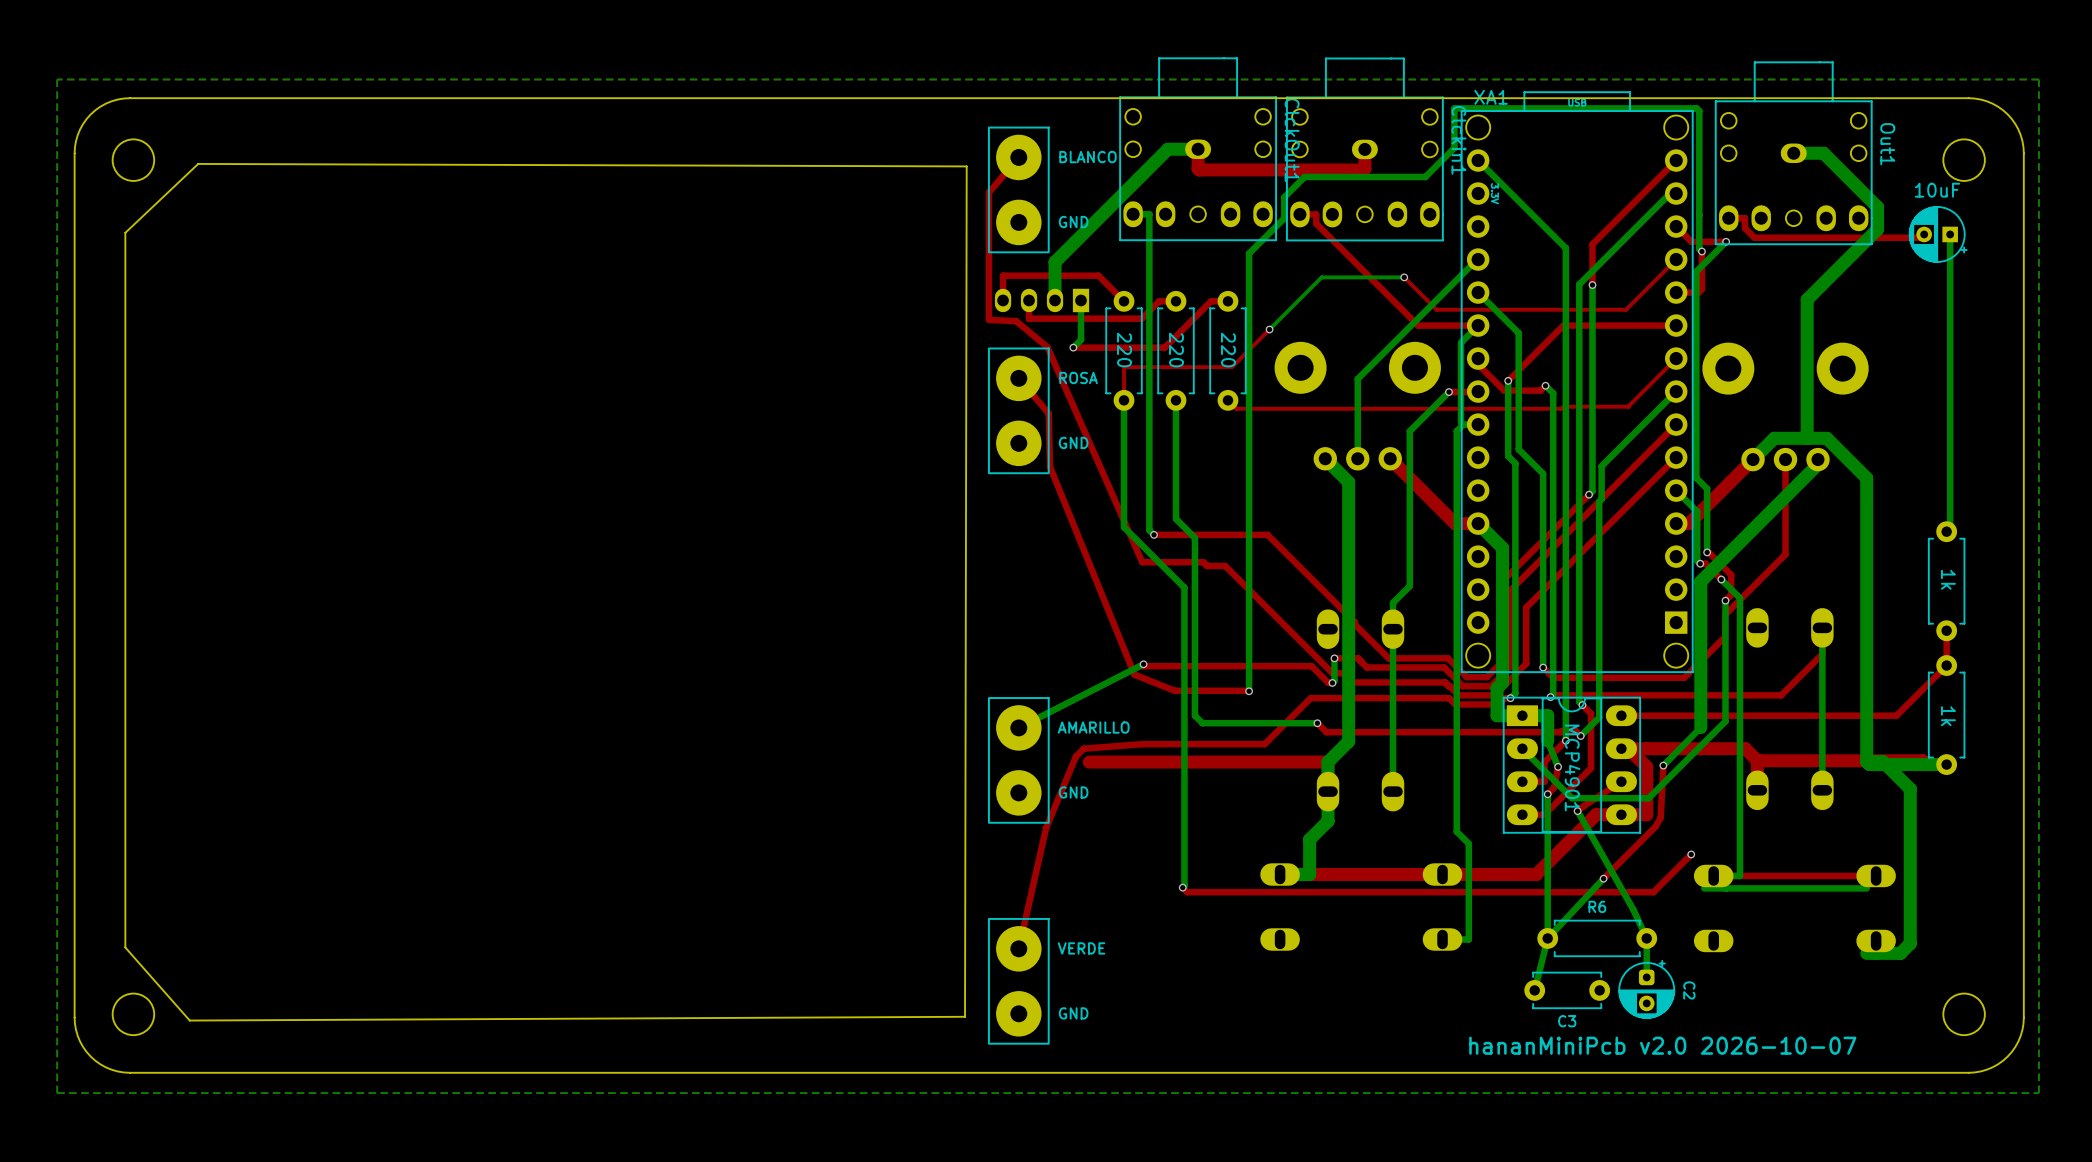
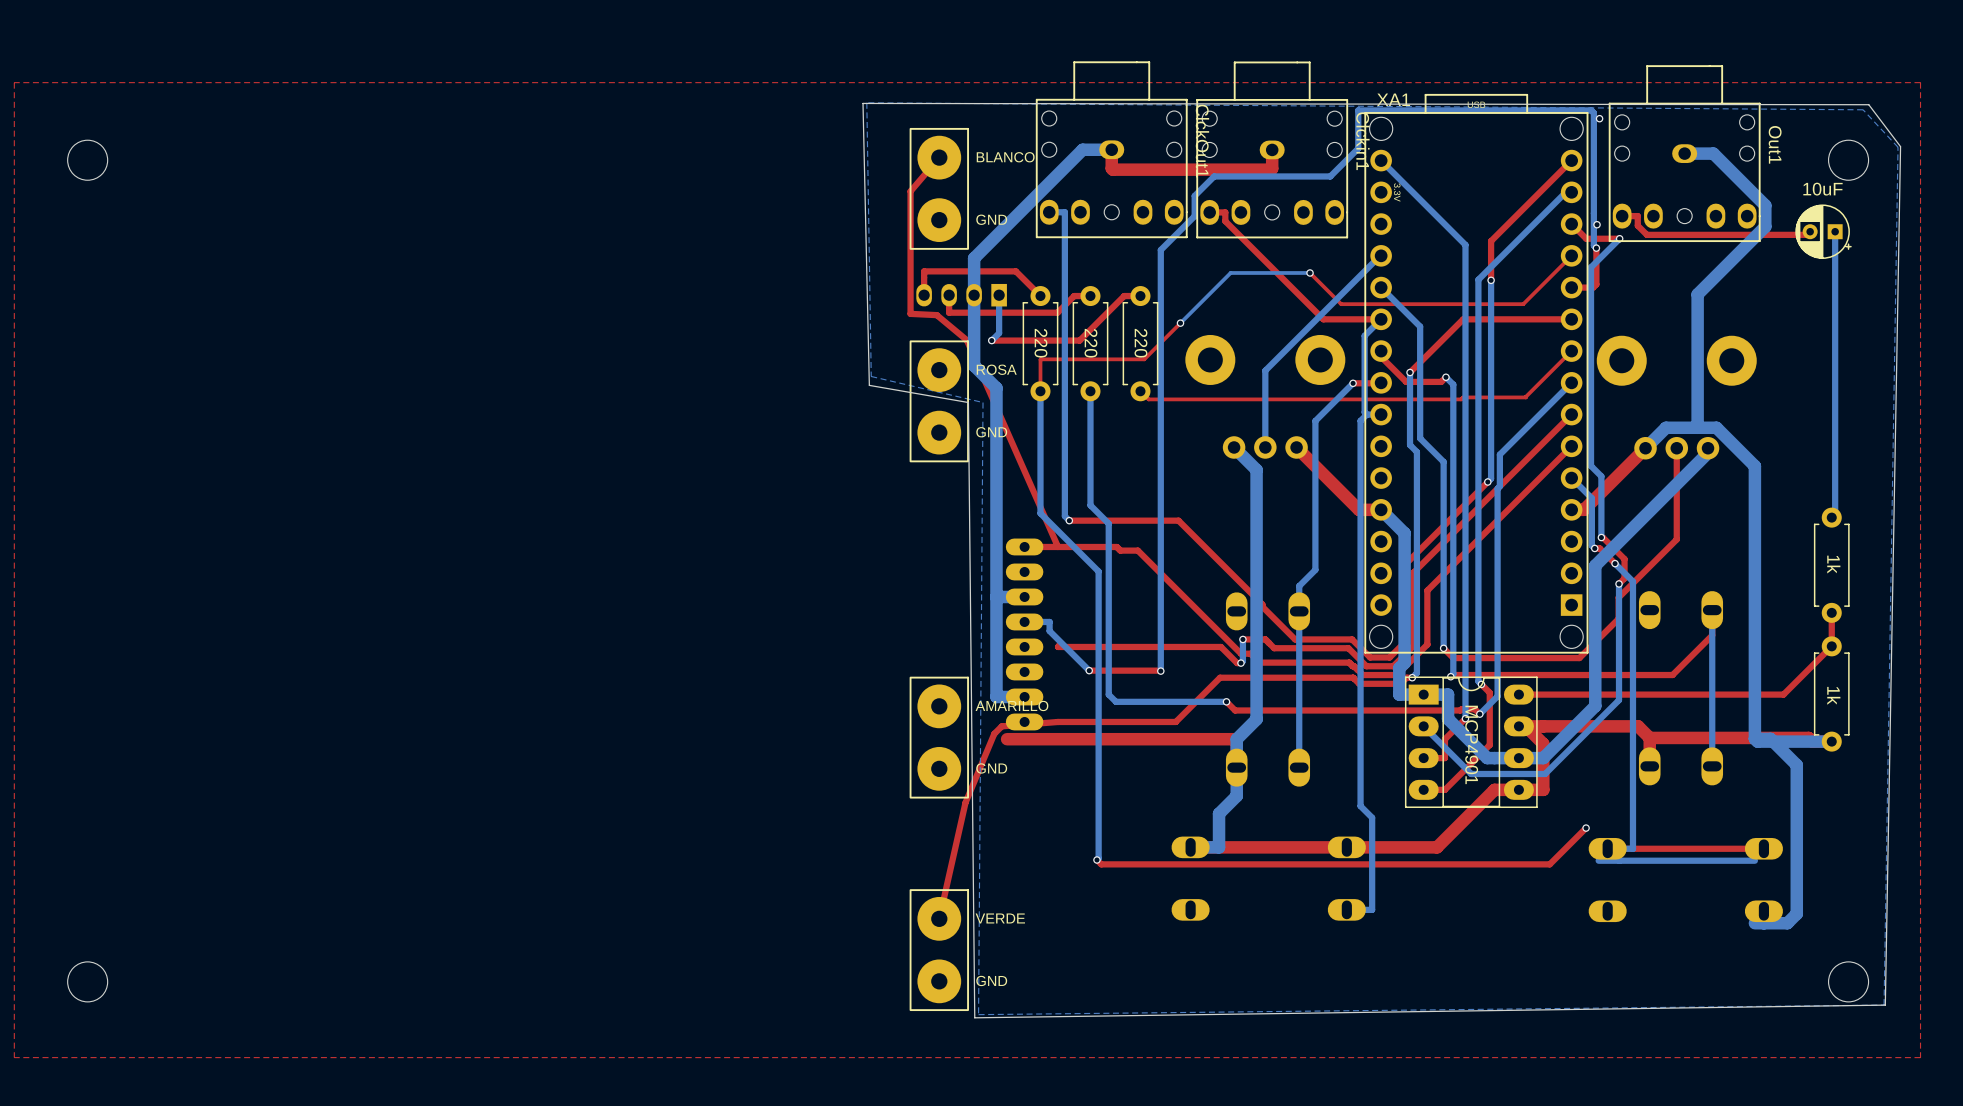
bottom zone outline: (2038, 79) (57, 79) (57, 1093) (2038, 1093) (2038, 79) -> (866, 102) (1863, 109) (1898, 147) (1884, 1005) (978, 1014) (983, 402) (871, 376) (866, 102)
board edge: (1968, 98) (129, 98) (105, 103) (90, 114) (83, 124) (76, 141) (74, 153) (74, 1017) (80, 1041) (86, 1052) (100, 1064) (111, 1069) (129, 1072) (1968, 1072) (1992, 1067) (2007, 1056) (2015, 1046) (2020, 1035) (2023, 1017) (2023, 153) (2020, 135) (2007, 114) (1986, 101) (1968, 98) -> (863, 103) (1868, 104) (1900, 146) (1885, 1005) (974, 1017) (968, 402) (869, 385) (863, 103)
via: none -> (1599, 118)
board edge: (198, 163) (125, 232) (125, 947) (189, 1020) (965, 1016) (966, 166) (198, 163) -> none
via: none -> (1597, 224)
bottom track: none -> (974, 295) (974, 365) (996, 388) (996, 596) (1024, 596)
top track: (1018, 378) (1048, 413) (1050, 466) (1134, 674) (1174, 690) -> none
top track: (1203, 562) (1142, 562) -> (1116, 547) (1024, 546)
bottom track: none -> (997, 596) (996, 696) (1024, 696)
bottom track: none -> (1024, 621) (1049, 621) (1049, 631) (1089, 670)
part: none -> (1024, 634)
bottom track: (1143, 664) (1018, 727) -> none
via position: (1143, 664) -> (1089, 670)
bottom track: (1700, 727) (1663, 765) -> (1595, 706) (1543, 758) (1487, 758) (1448, 718)
bottom track: (1547, 741) (1558, 766) -> none
top track: (1663, 765) (1660, 817) (1655, 826) (1603, 878) -> none
via: (1663, 765) -> none
top track: (1558, 766) (1554, 787) (1547, 794) -> none
via: (1558, 766) -> none
top track: (1621, 781) (1577, 811) -> none
bottom track: (1547, 794) (1547, 938) -> none
via: (1547, 794) -> none
bottom track: (1577, 811) (1633, 909) (1646, 938) (1646, 977) -> none
via: (1577, 811) -> none
bottom track: (1603, 878) (1547, 938) -> none
via: (1603, 878) -> none
bottom track: (1547, 938) (1534, 990) -> none
R6: (1597, 938) -> none
C2: (1646, 989) -> none
C3: (1567, 990) -> none
text: hananMiniPcb v2.0 2026-10-07 (1662, 1045) -> none

